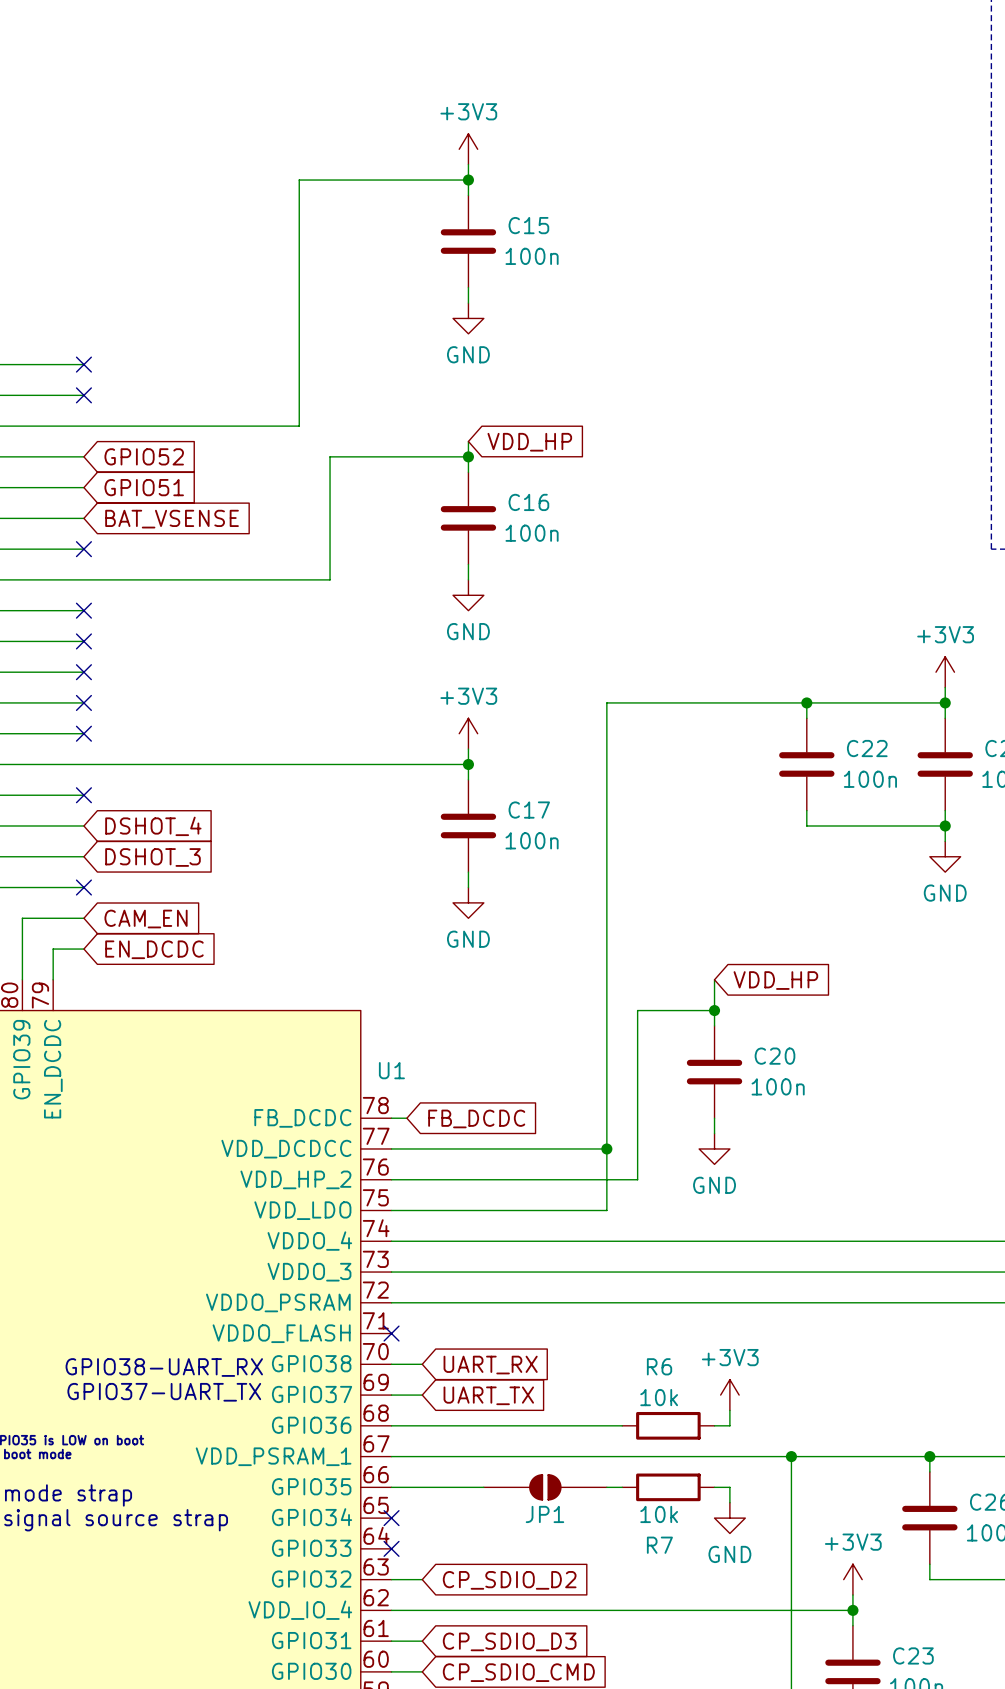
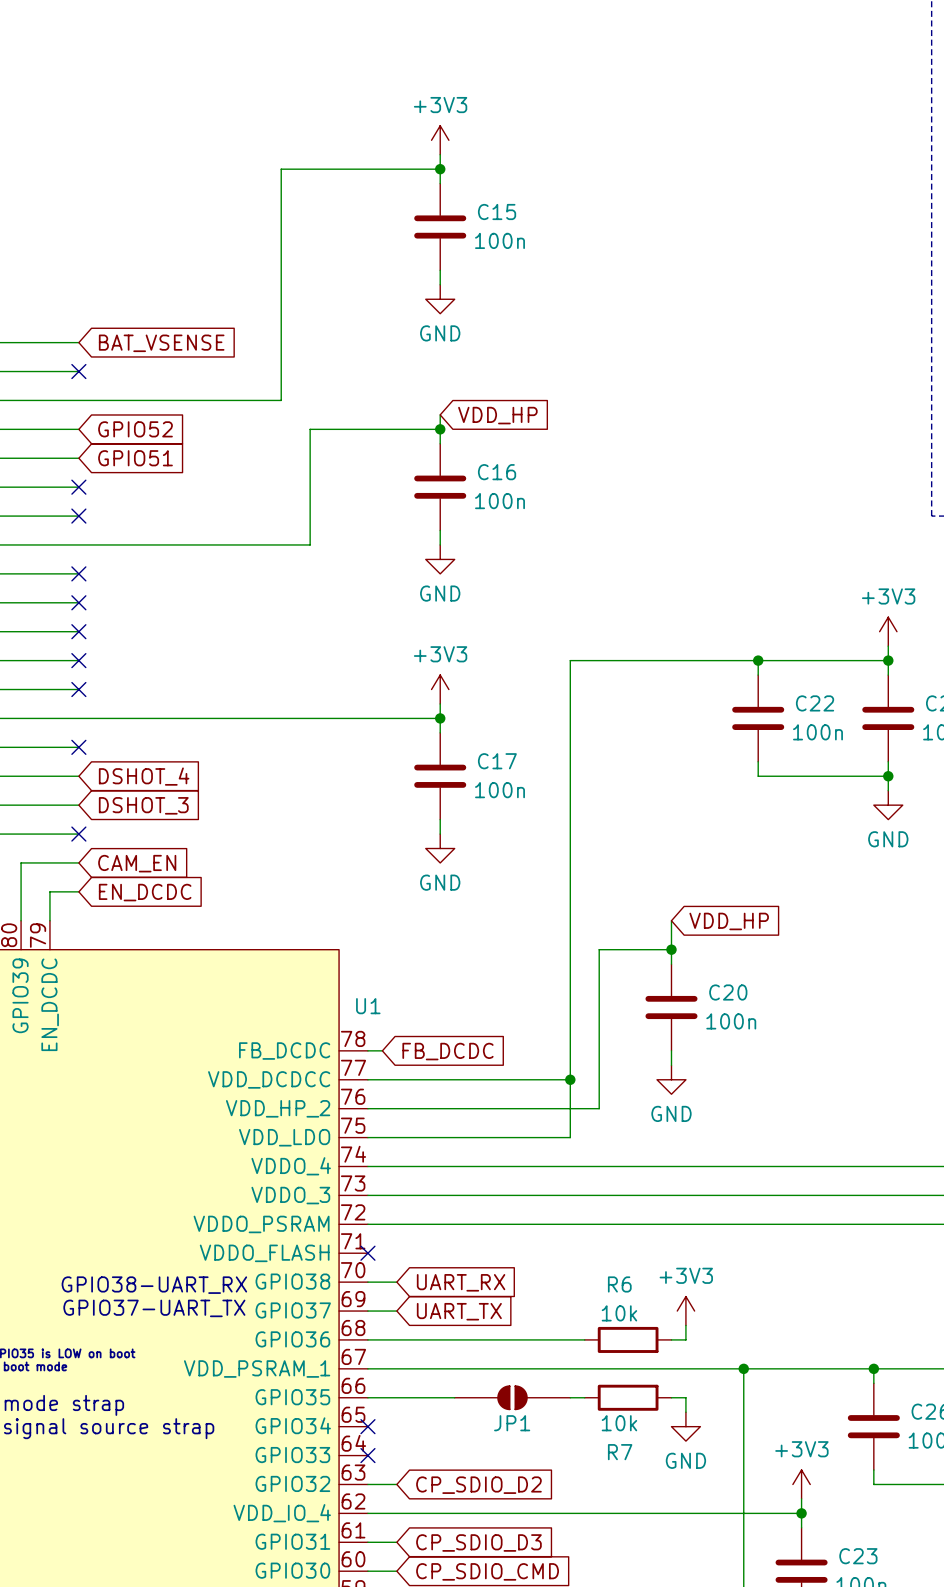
no-connect mark: (83, 364) -> none
no-connect mark: none -> (78, 487)
global label position: BAT_VSENSE (172, 519) -> BAT_VSENSE (161, 343)

